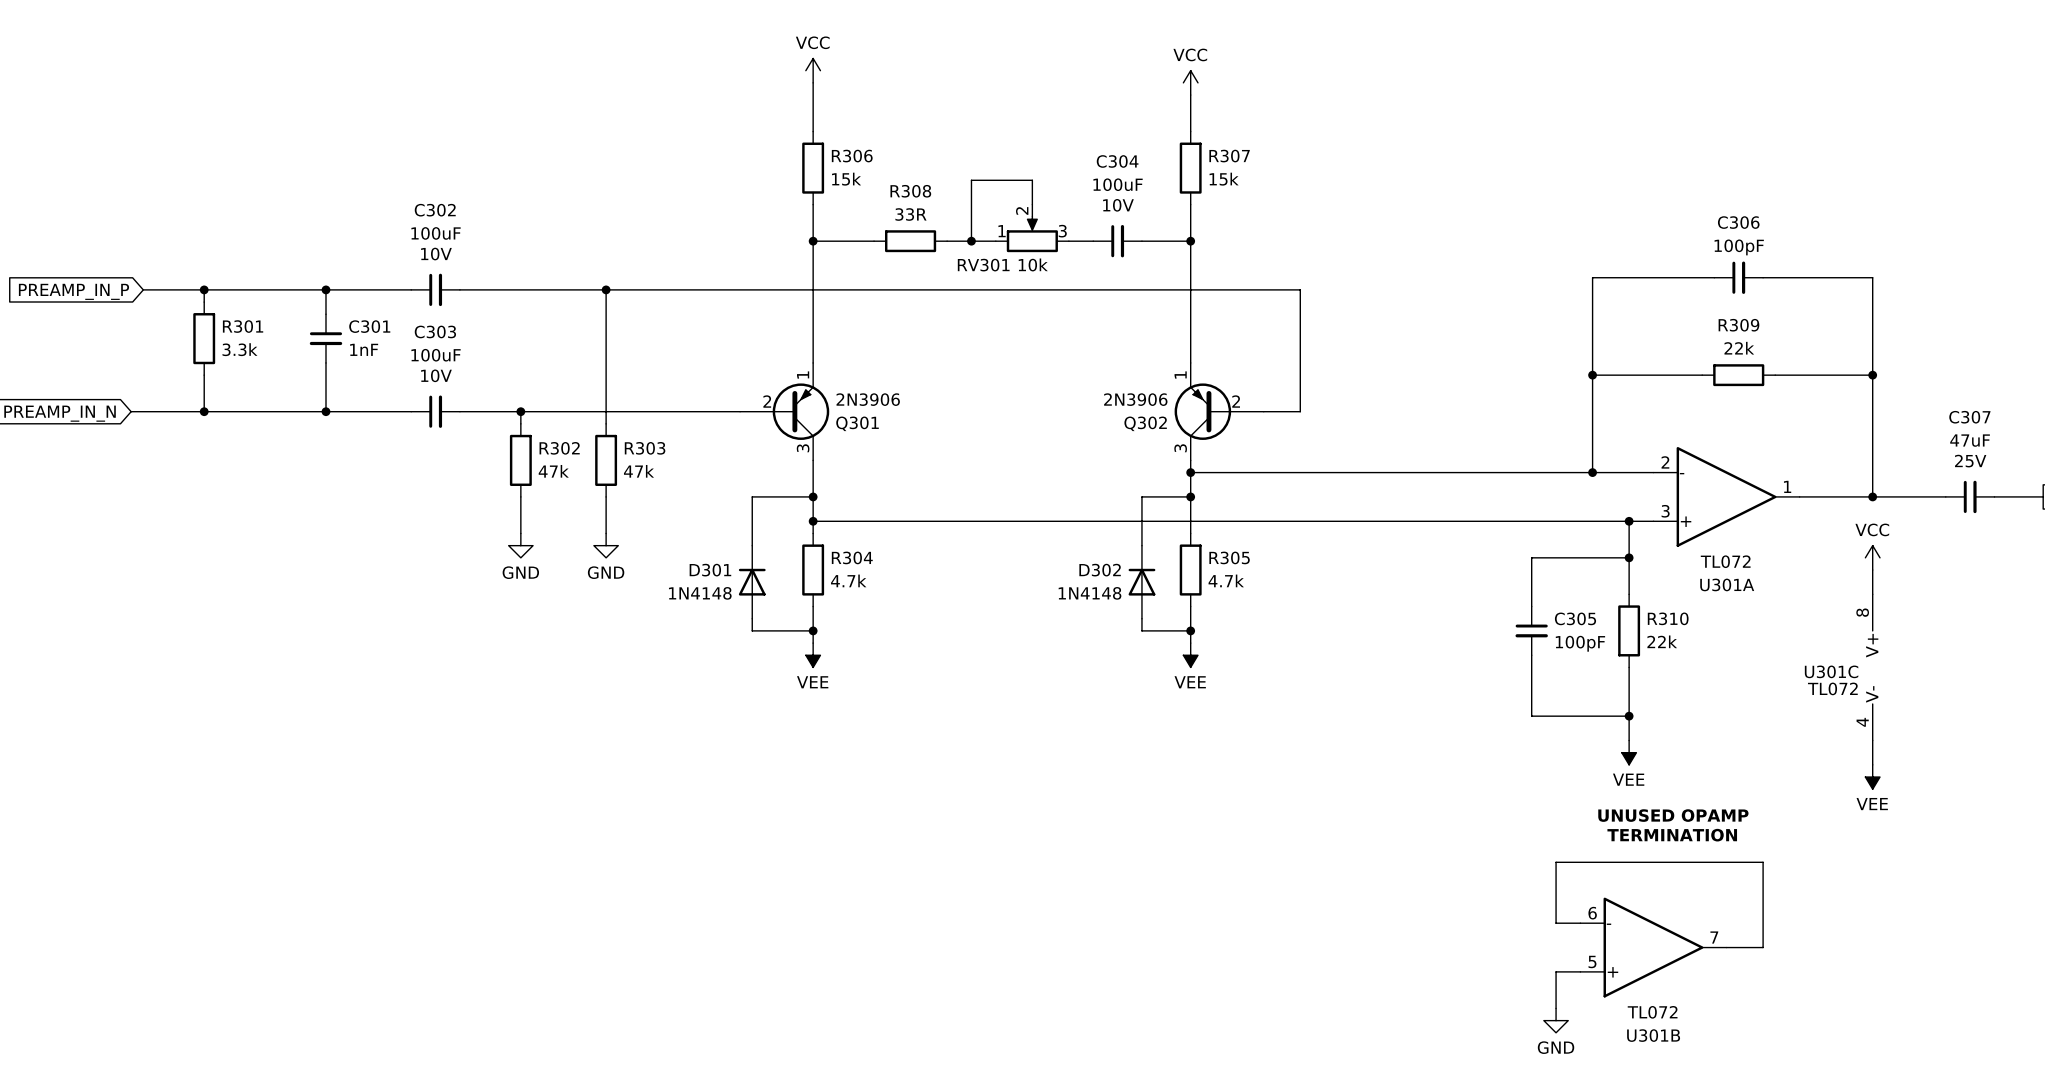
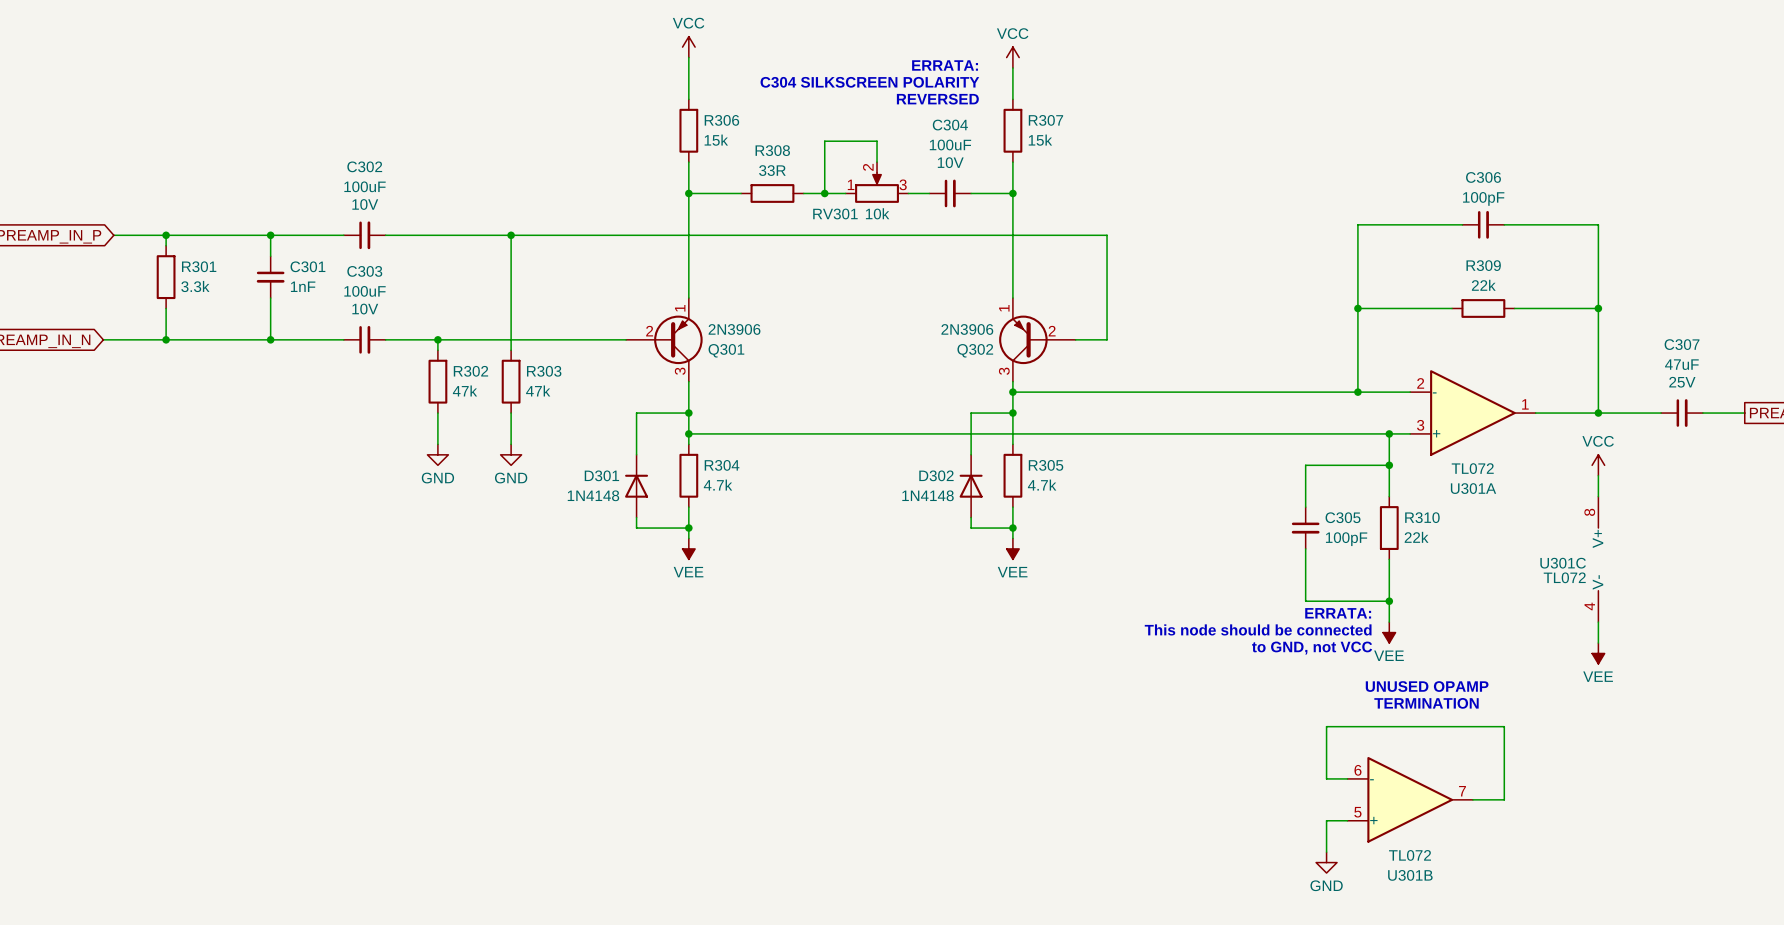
text: none -> ERRATA: (945, 65)
text: none -> C304 SILKSCREEN POLARITY (869, 82)
text: none -> REVERSED (937, 99)
text: none -> ERRATA: (1338, 613)
text: none -> This node should be connected (1258, 629)
text: none -> to GND, not VCC (1312, 648)

